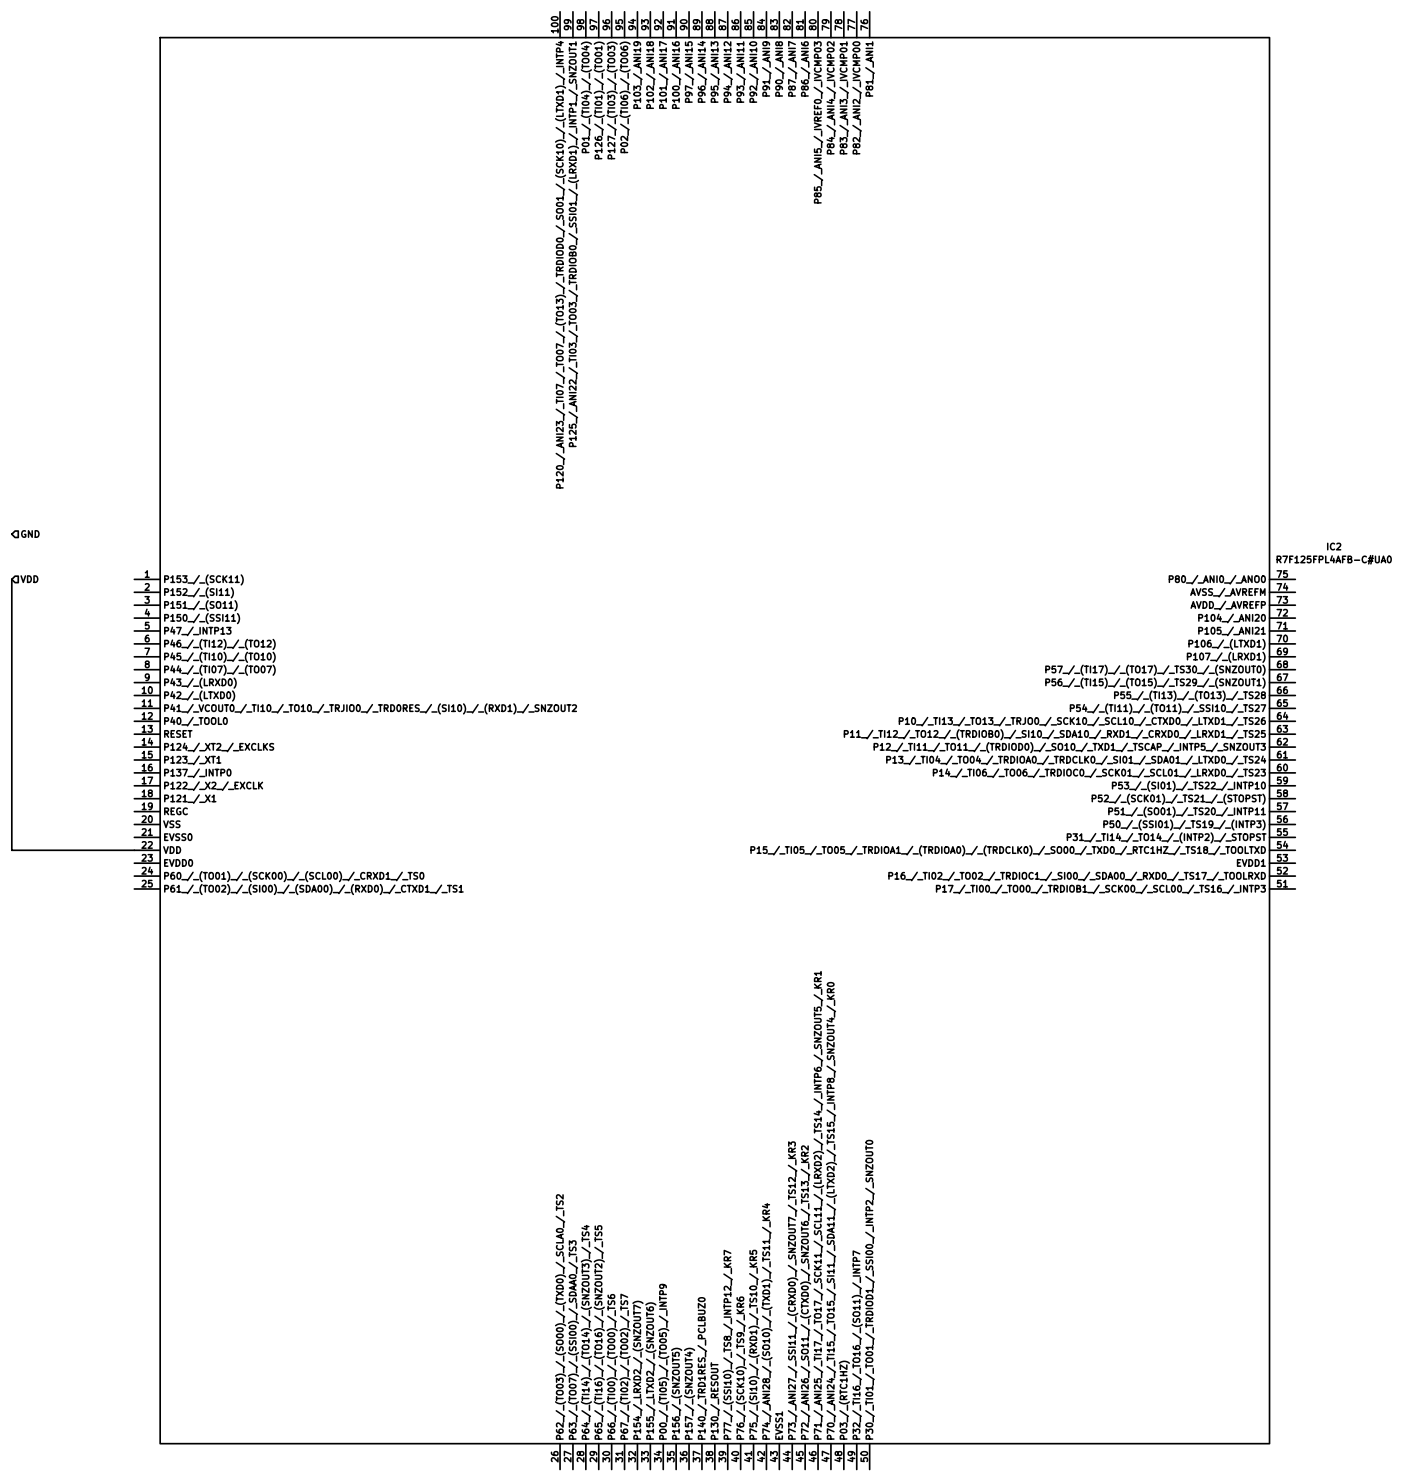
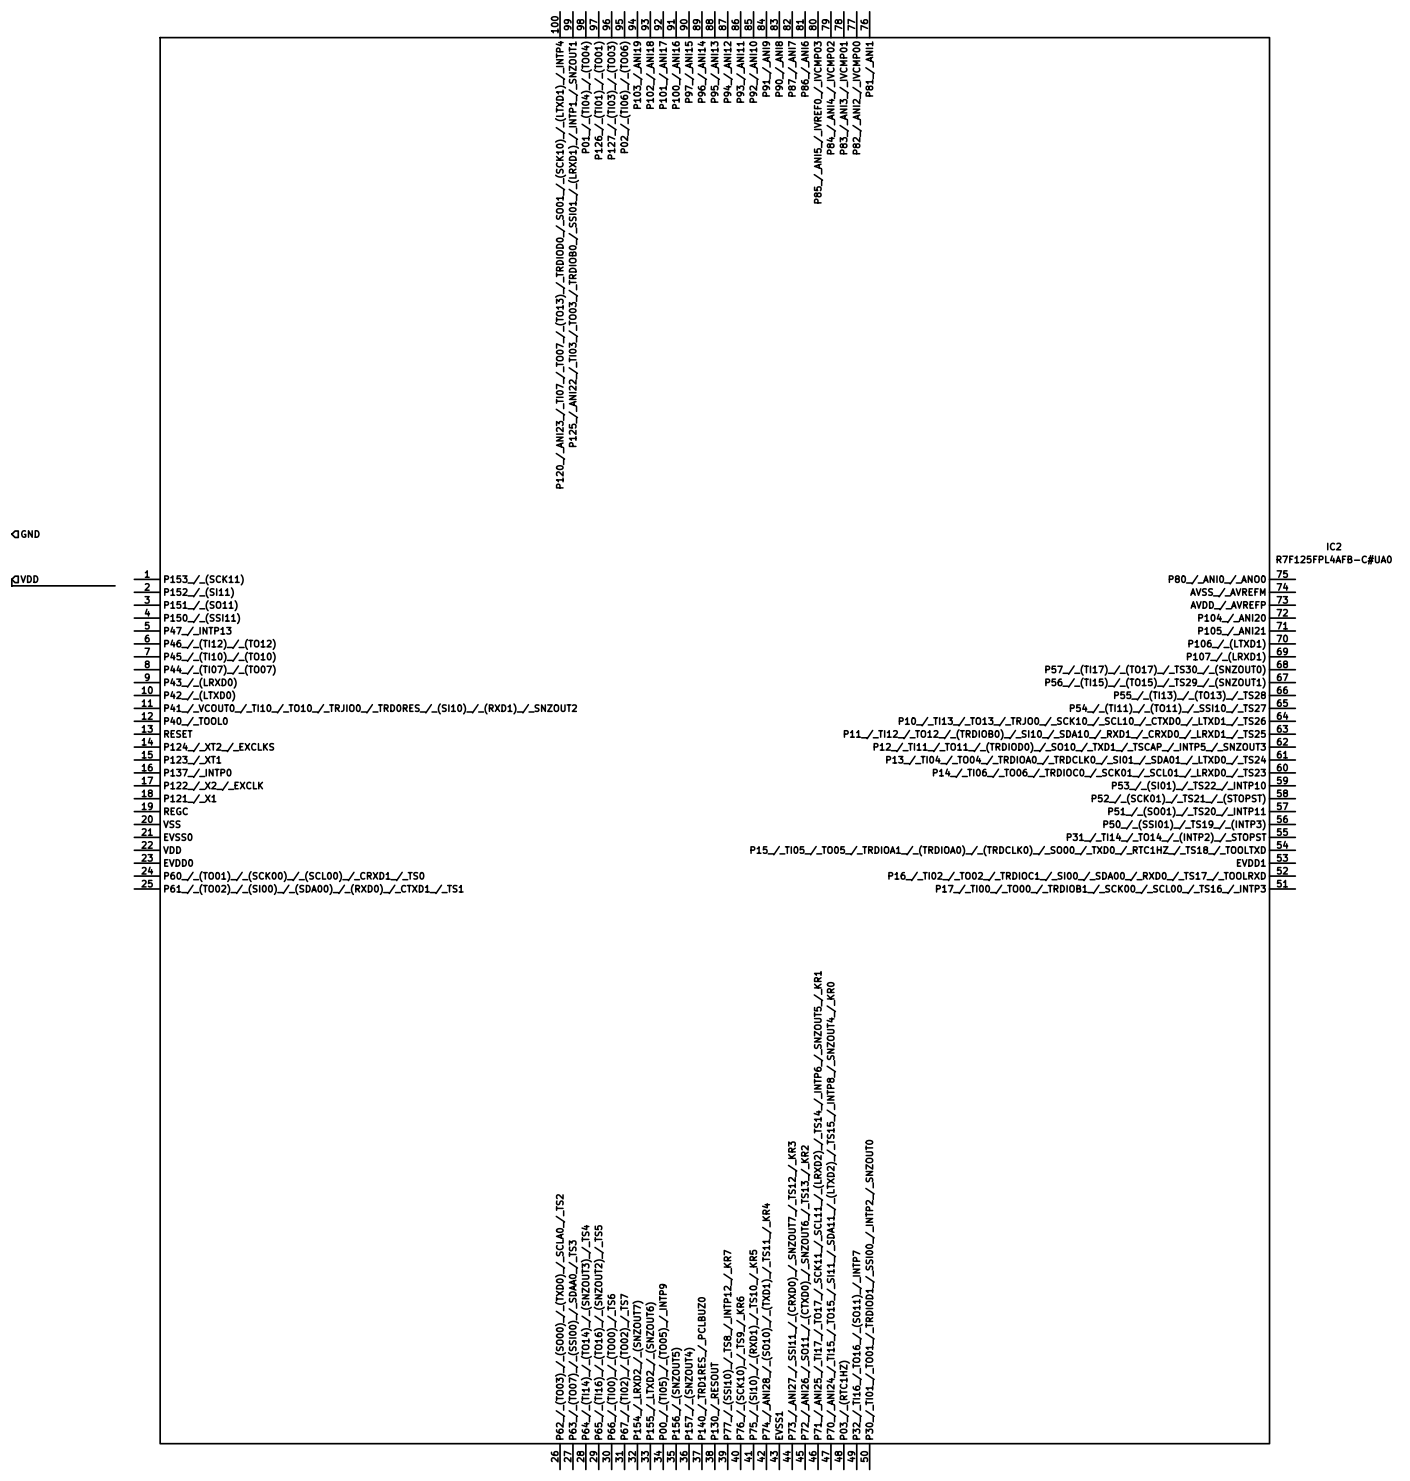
wire: (11, 585) (11, 850) (134, 850) -> (11, 585) (115, 585)

